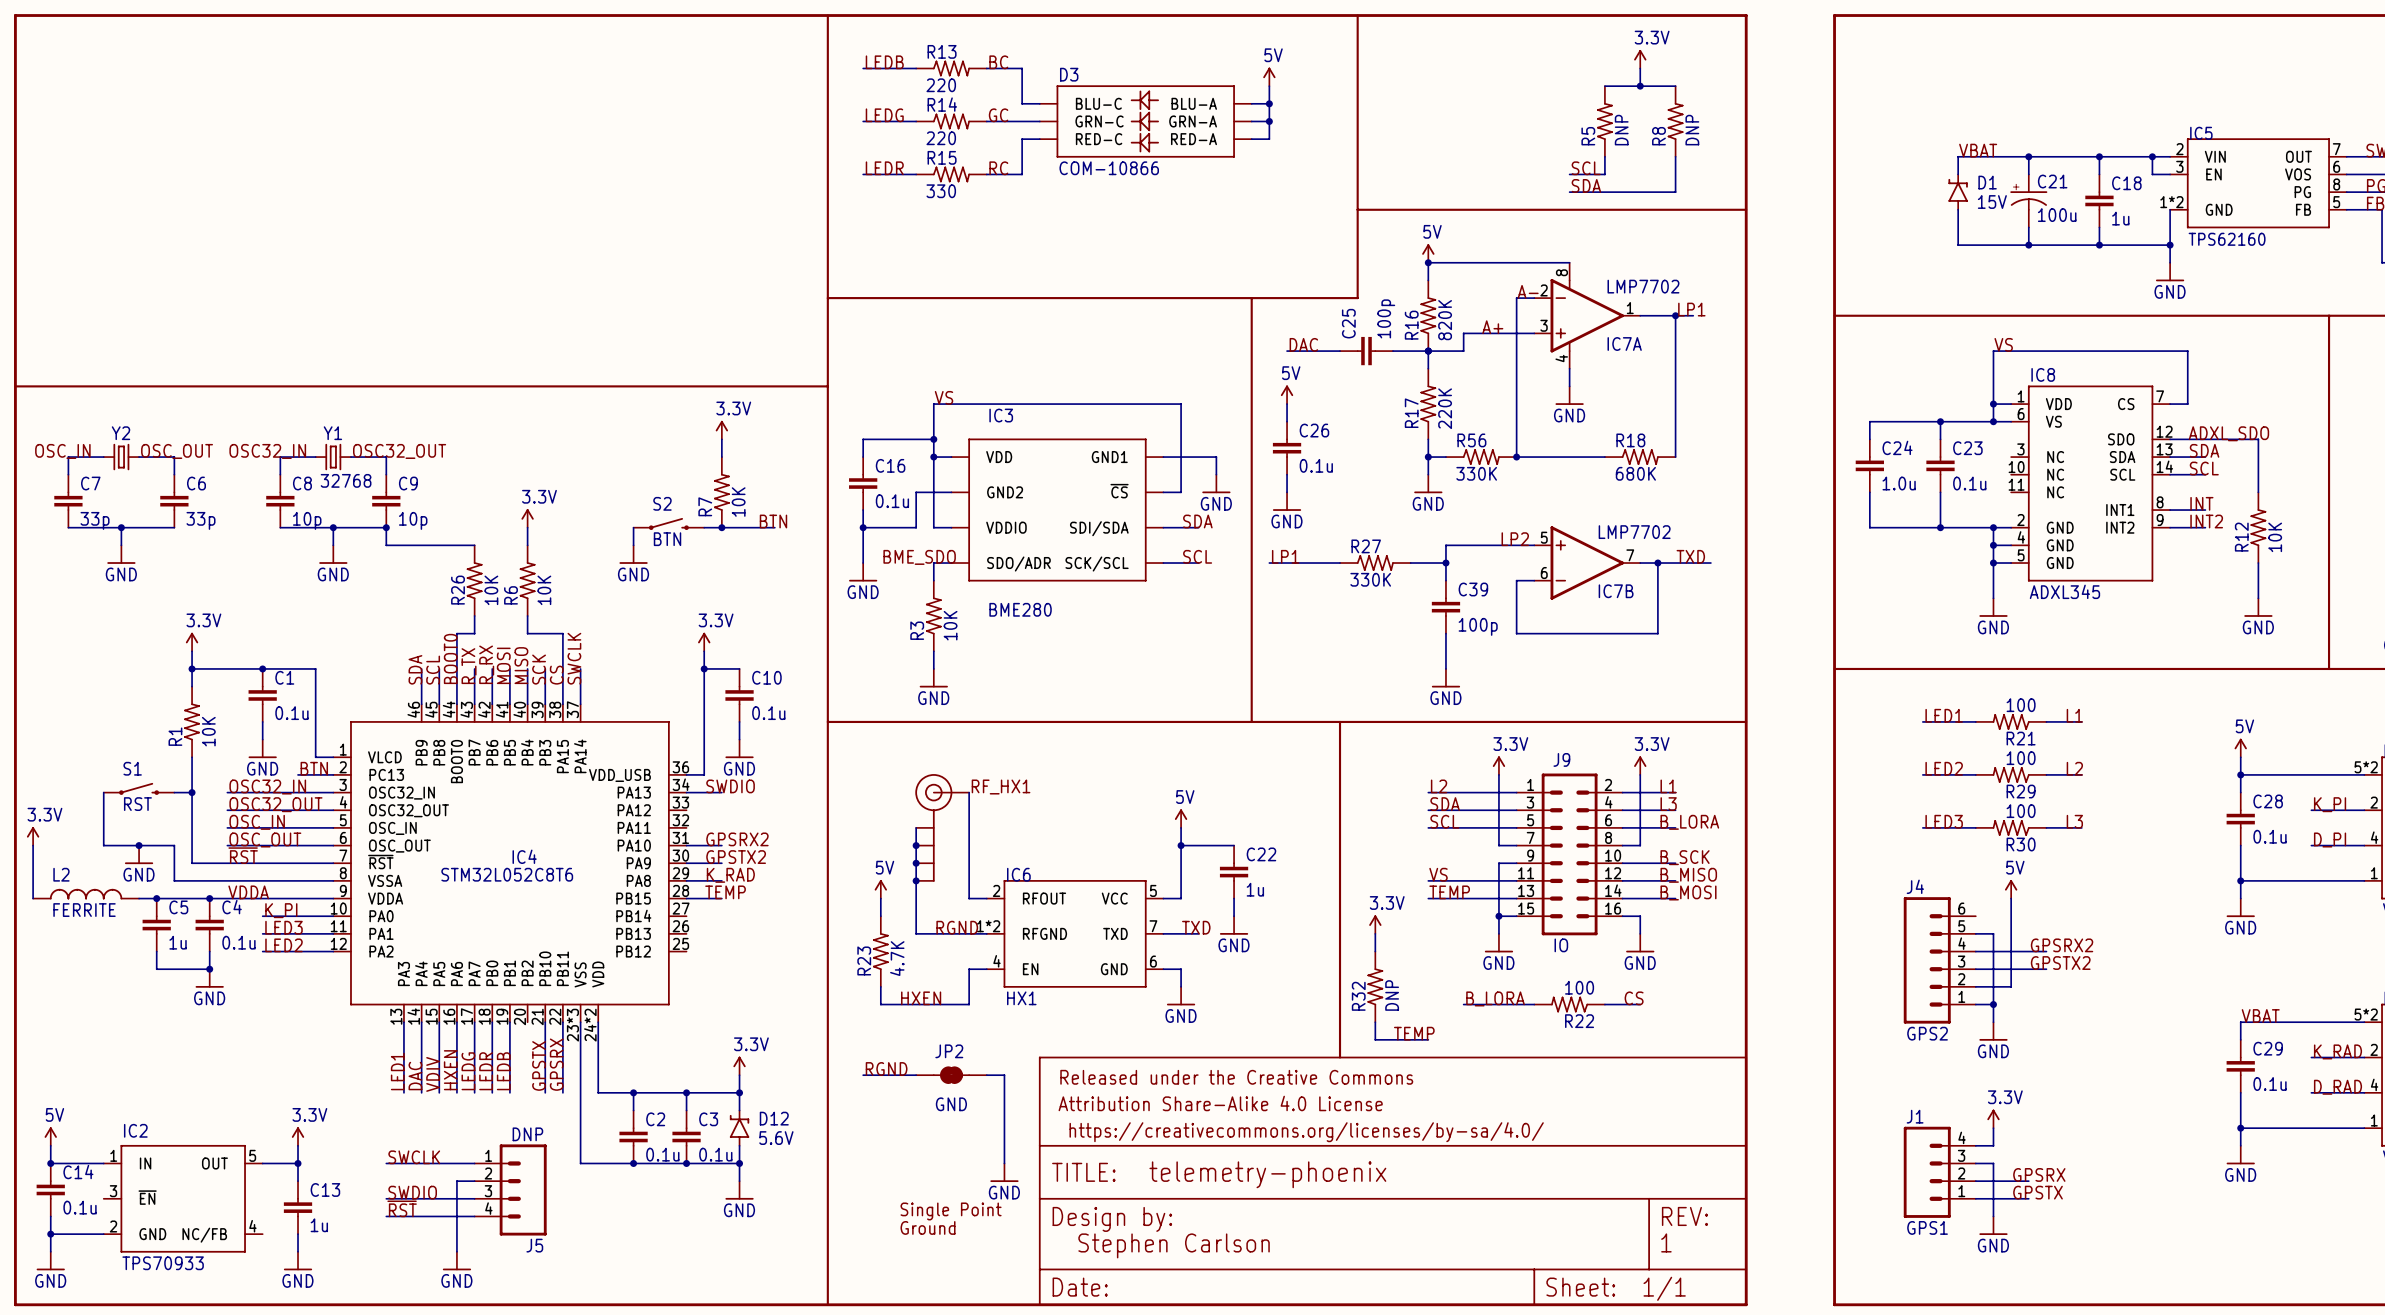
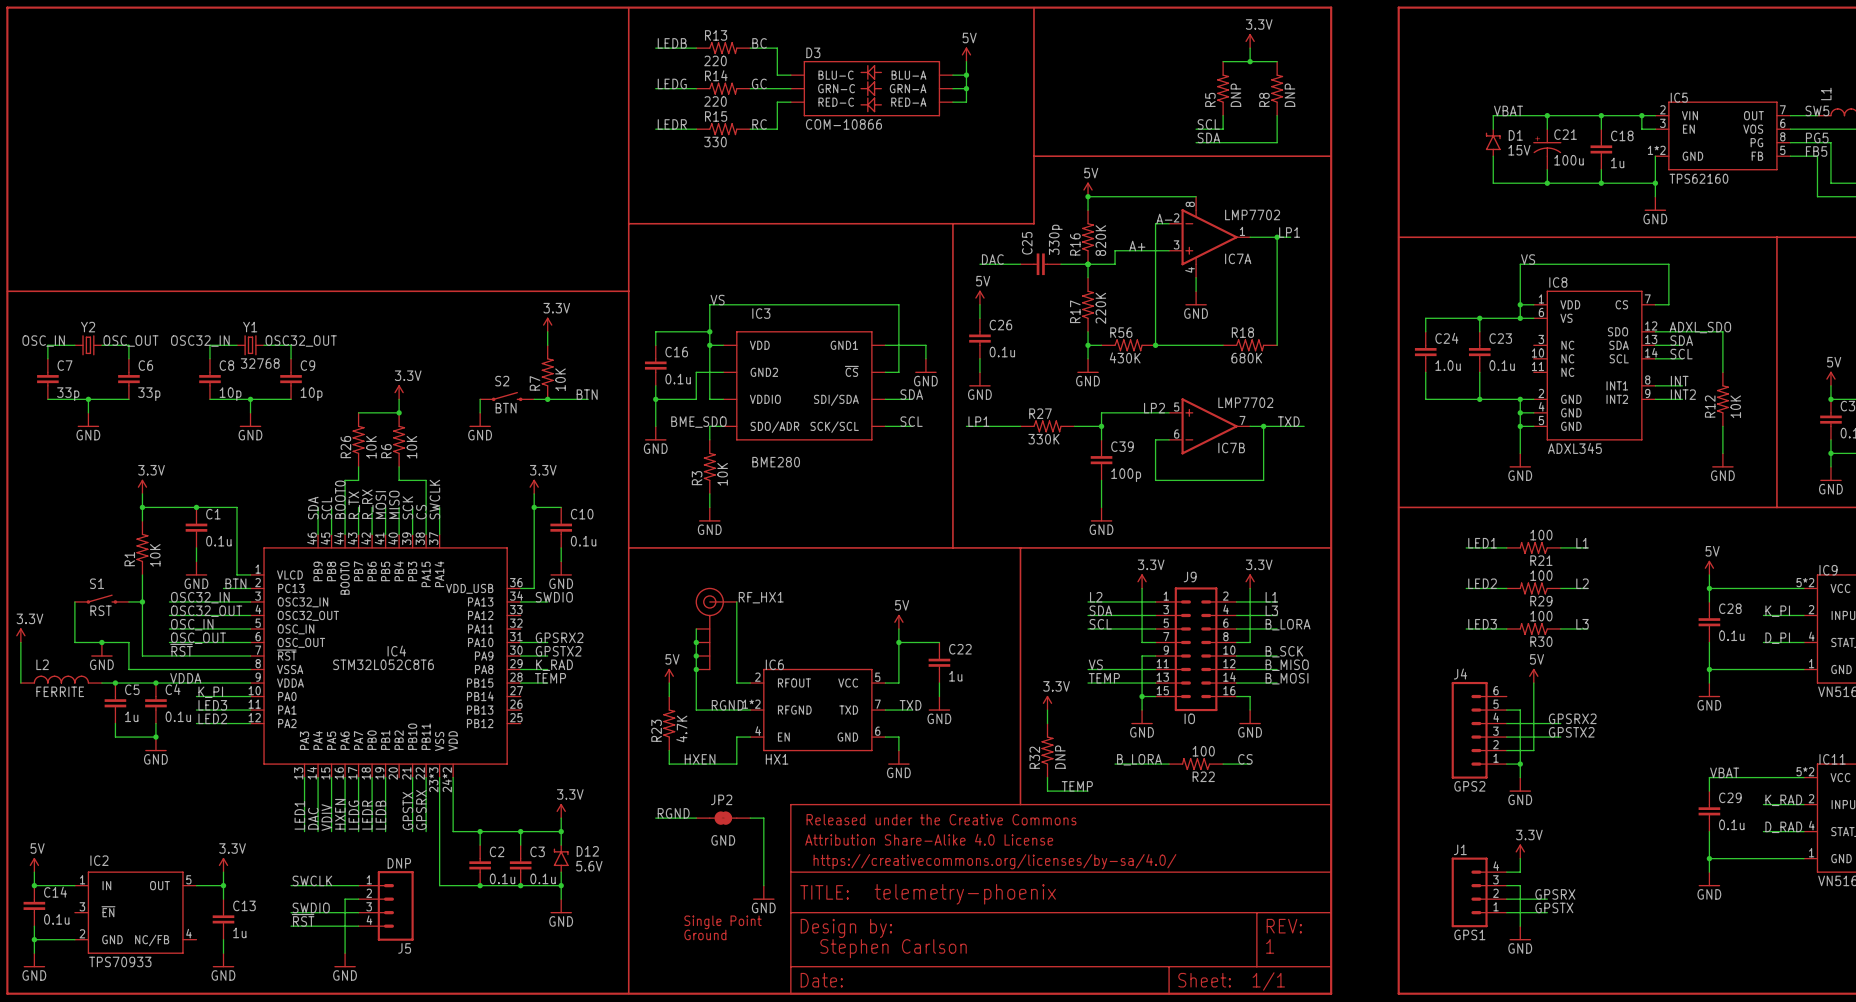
C25 value: 100p (1386, 318) -> 330p (1055, 239)
R56 value: 330K (1476, 473) -> 430K (1125, 357)
wire: (386, 527) (386, 545) (474, 545) -> (399, 412) (358, 412)
junction: (386, 527) -> none
junction: none -> (399, 412)

